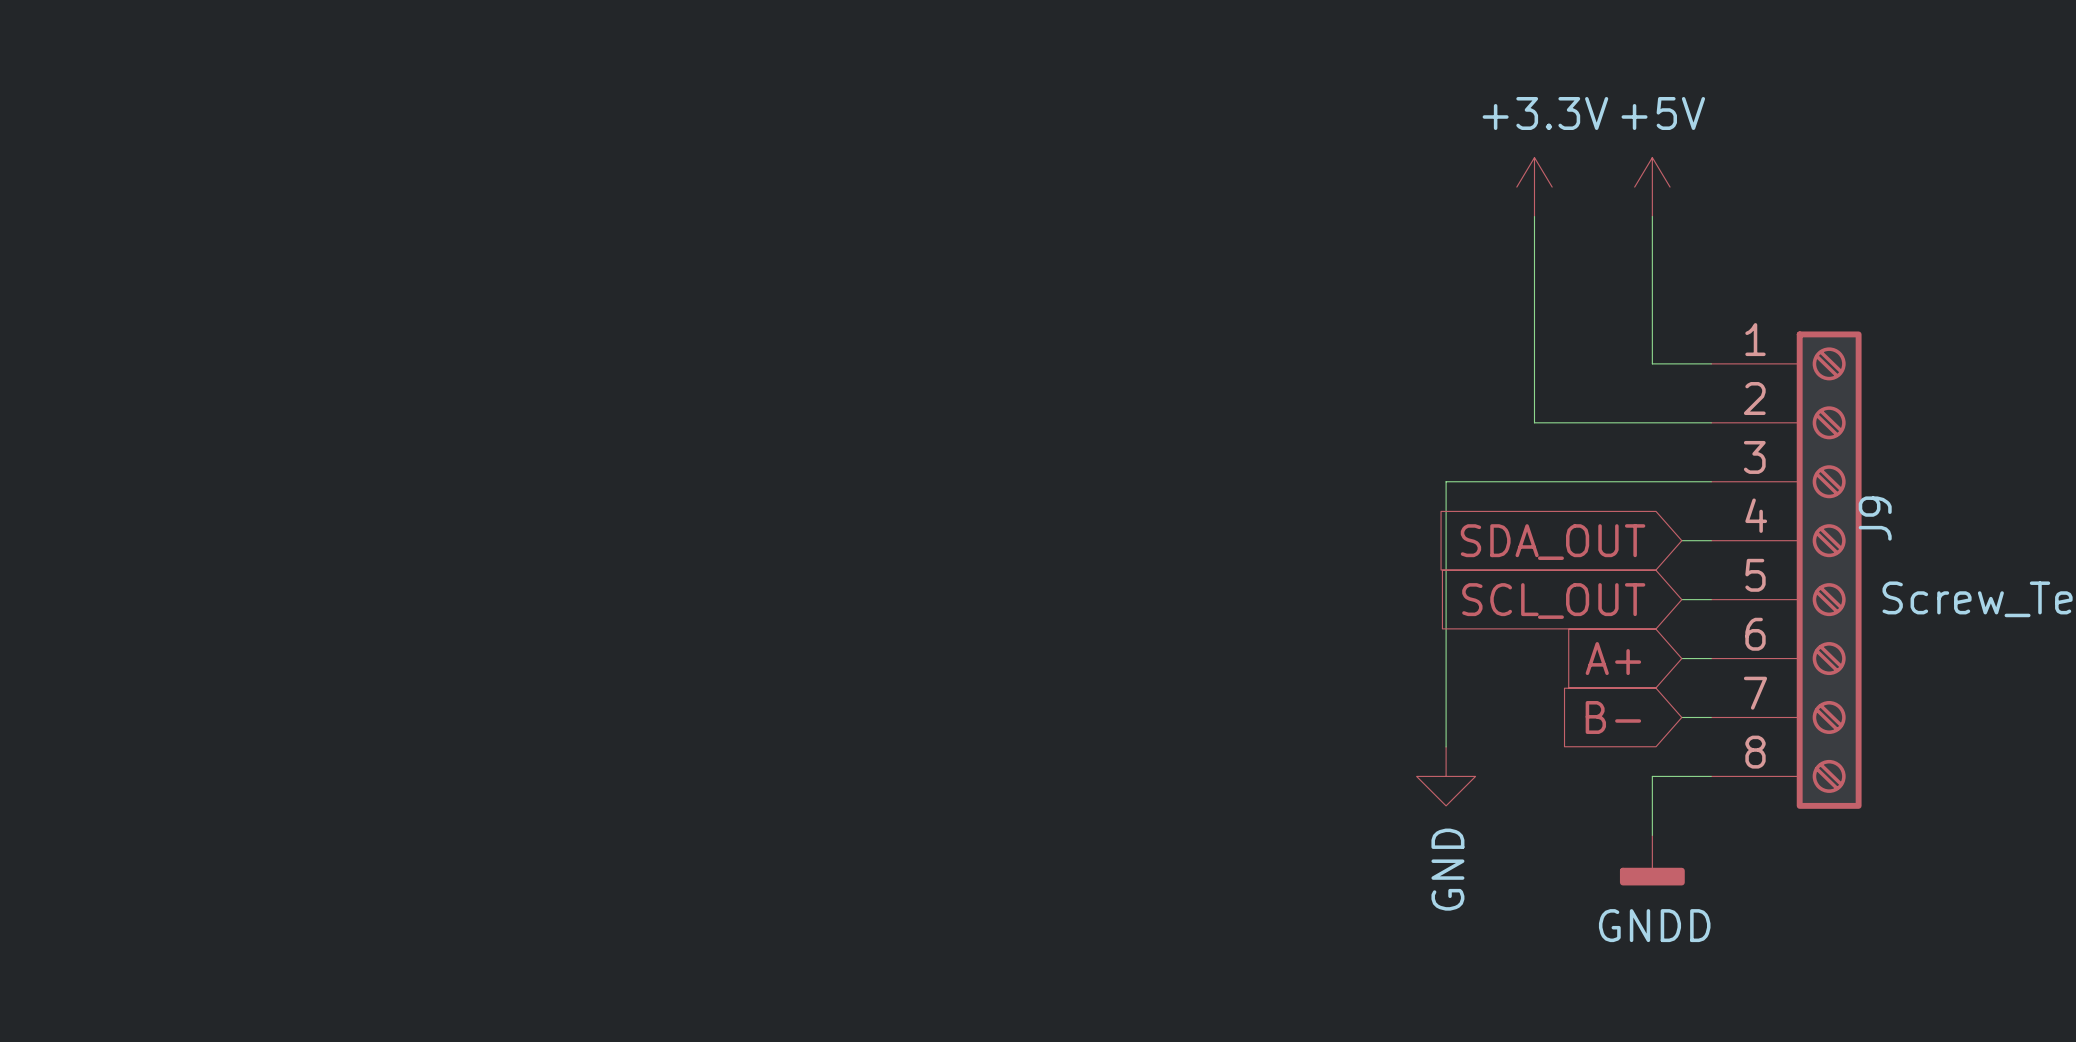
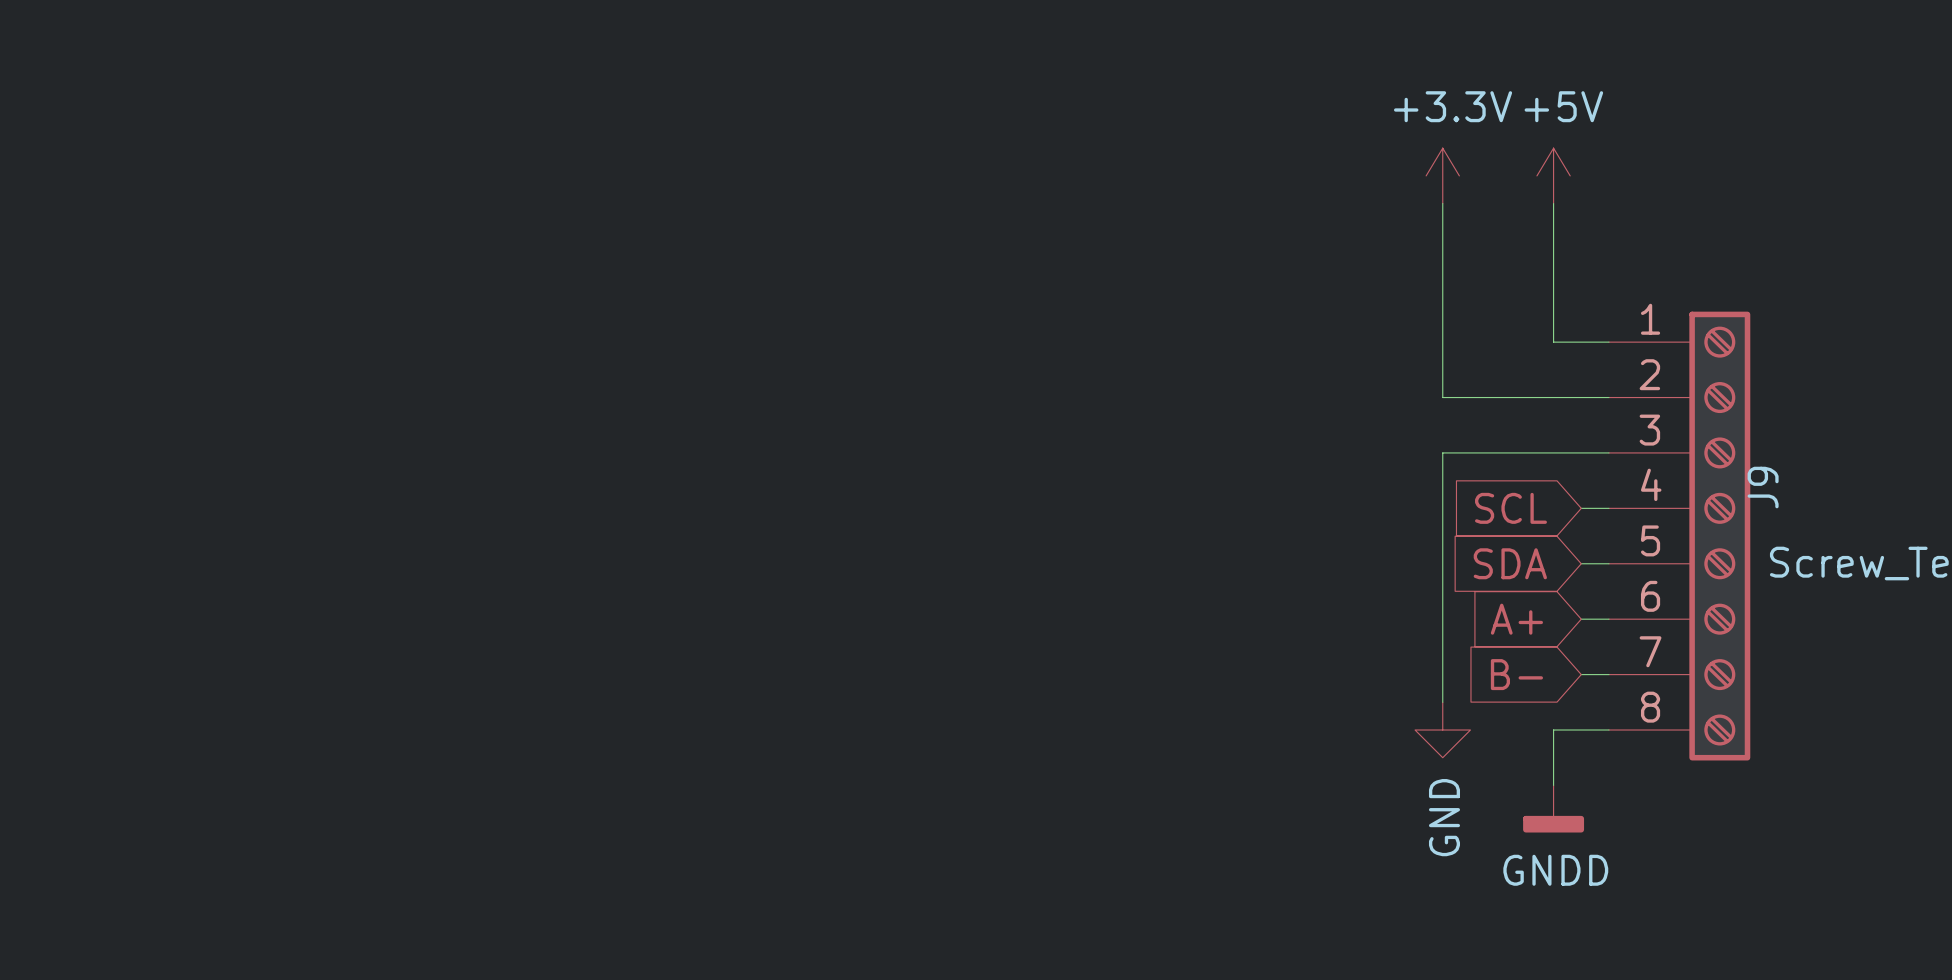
wire: (1534, 481) (1446, 481) (1446, 746) -> (1442, 452) (1442, 702)
global label: SDA_OUT (1553, 542) -> SCL (1510, 508)
global label: SCL_OUT (1553, 601) -> SDA (1510, 563)
power symbol position: GND (1446, 776) -> GND (1442, 730)

